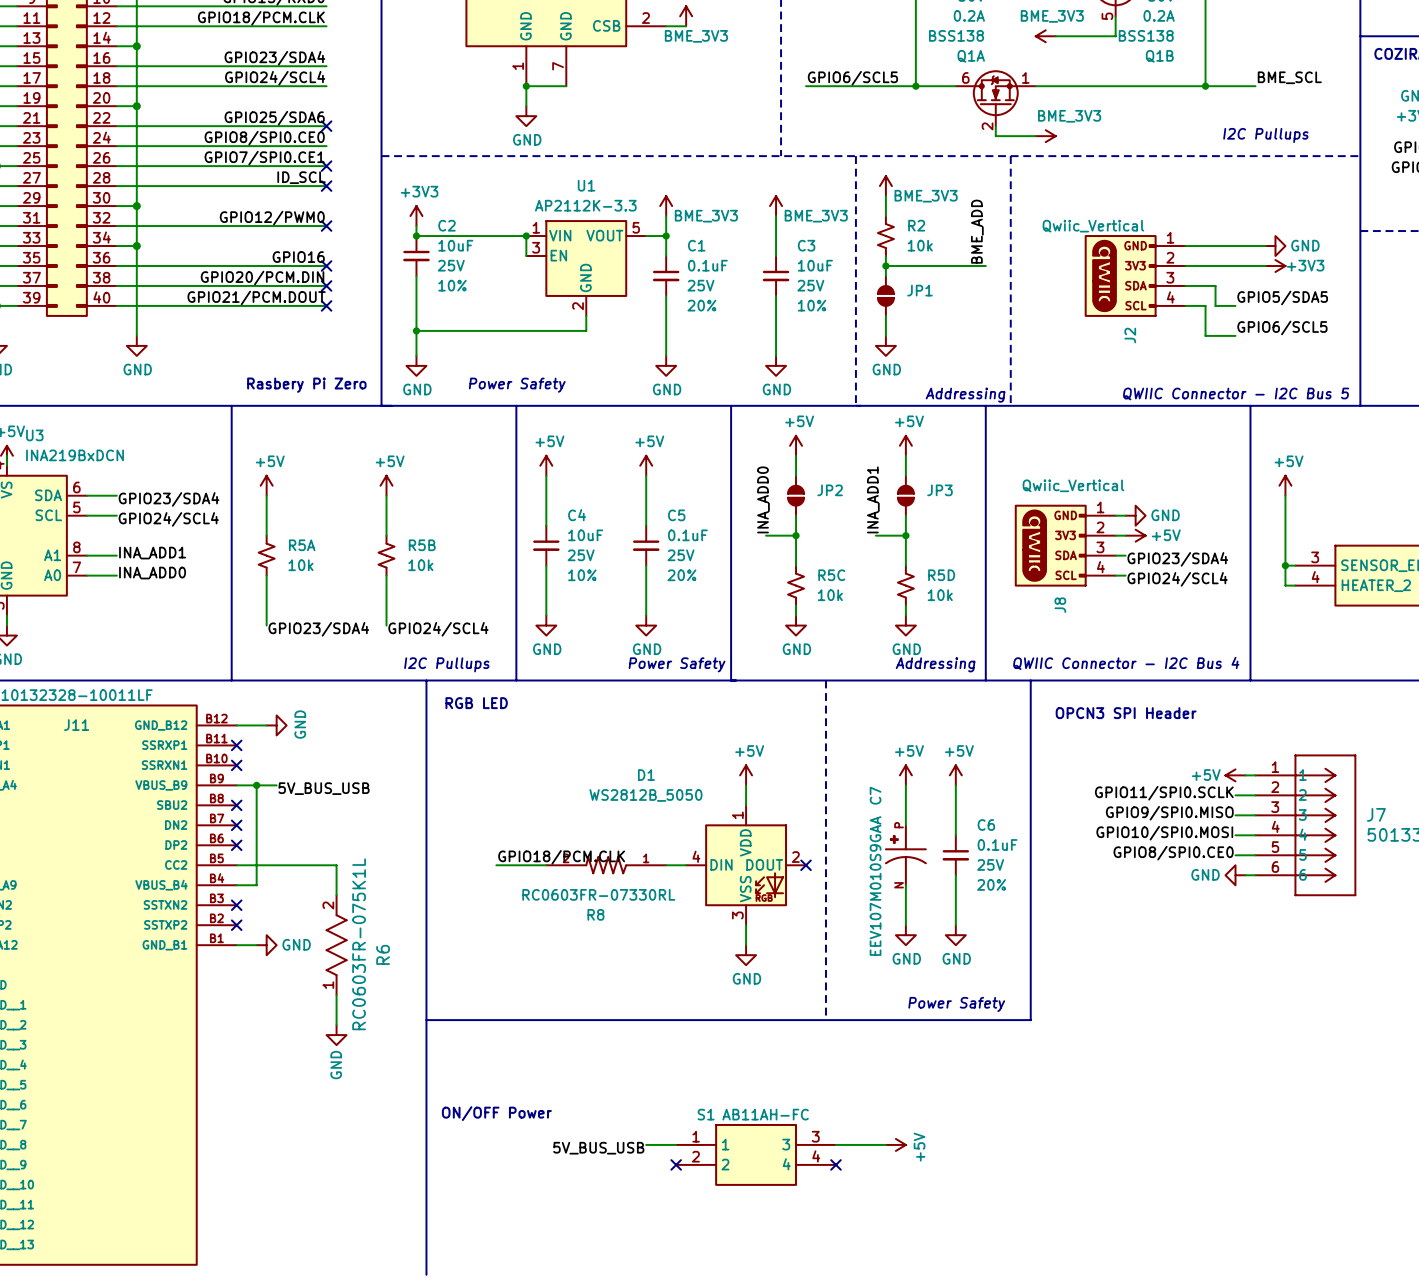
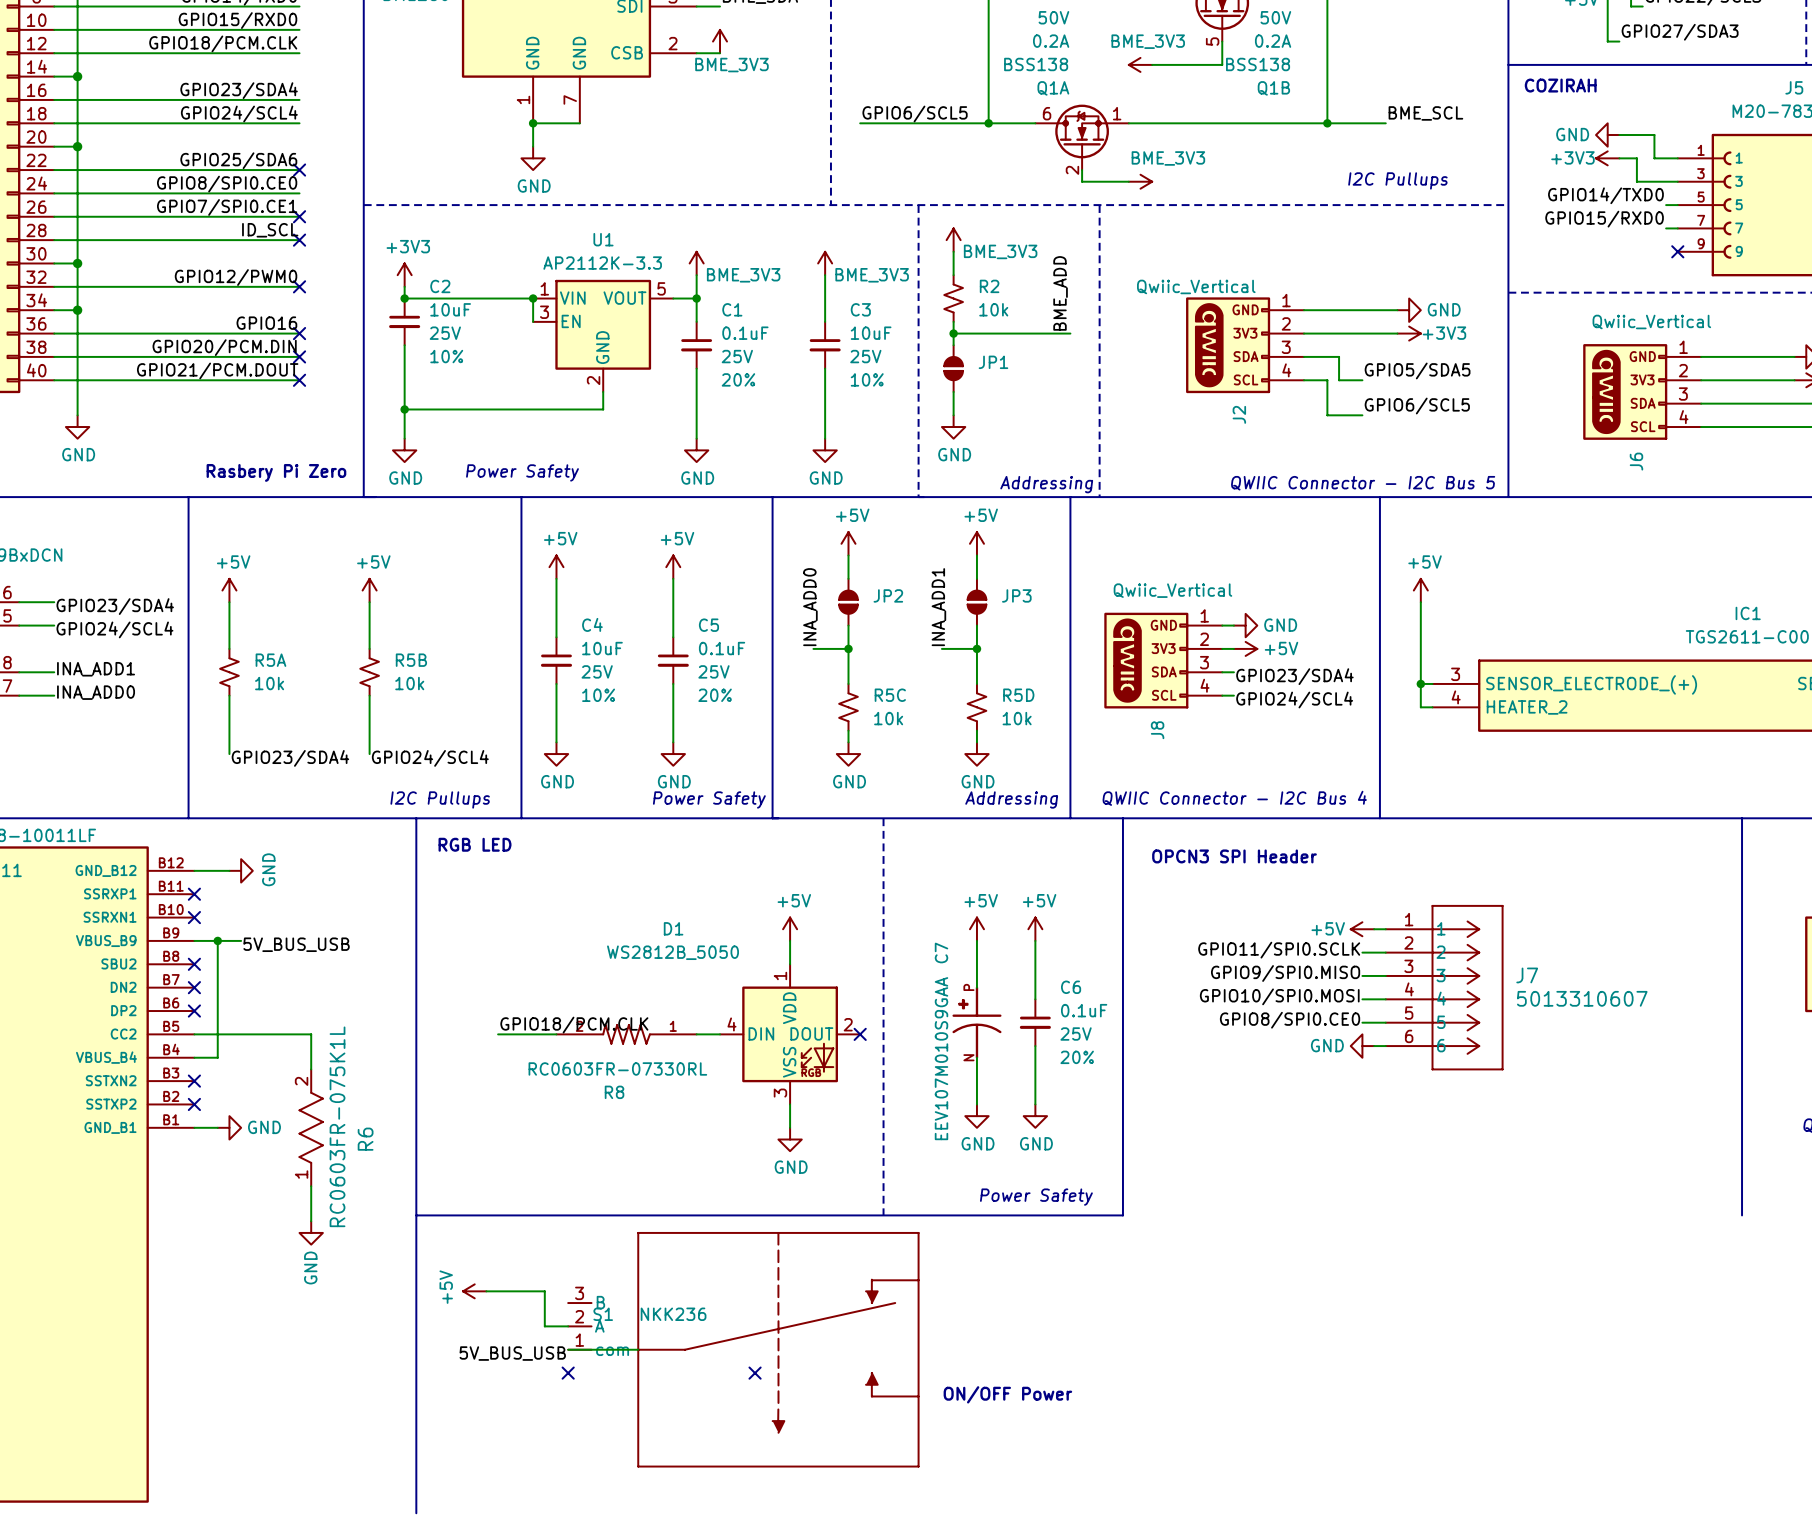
power symbol: none -> +5V (474, 1291)
wire: none -> (486, 1291) (544, 1291) (544, 1326) (568, 1326)
text: ON/OFF Power (496, 1113) -> none
S1 name position: S1 (706, 1114) -> S1 (603, 1314)
S1 value: AB11AH-FC (765, 1114) -> NKK236 (673, 1314)
S1 symbol: [676, 1123, 836, 1186] -> [568, 1232, 920, 1468]
wire: none -> (568, 1349) (638, 1349)
wire: (646, 1144) (676, 1144) -> none
wire: (835, 1144) (885, 1144) -> none
power symbol: +5V (895, 1144) -> none
label position: 5V_BUS_USB (598, 1148) -> 5V_BUS_USB (512, 1353)
no-connect mark: none -> (568, 1373)
no-connect mark position: (676, 1164) -> (755, 1373)
no-connect mark: (835, 1164) -> none
text: none -> ON/OFF Power (1007, 1394)

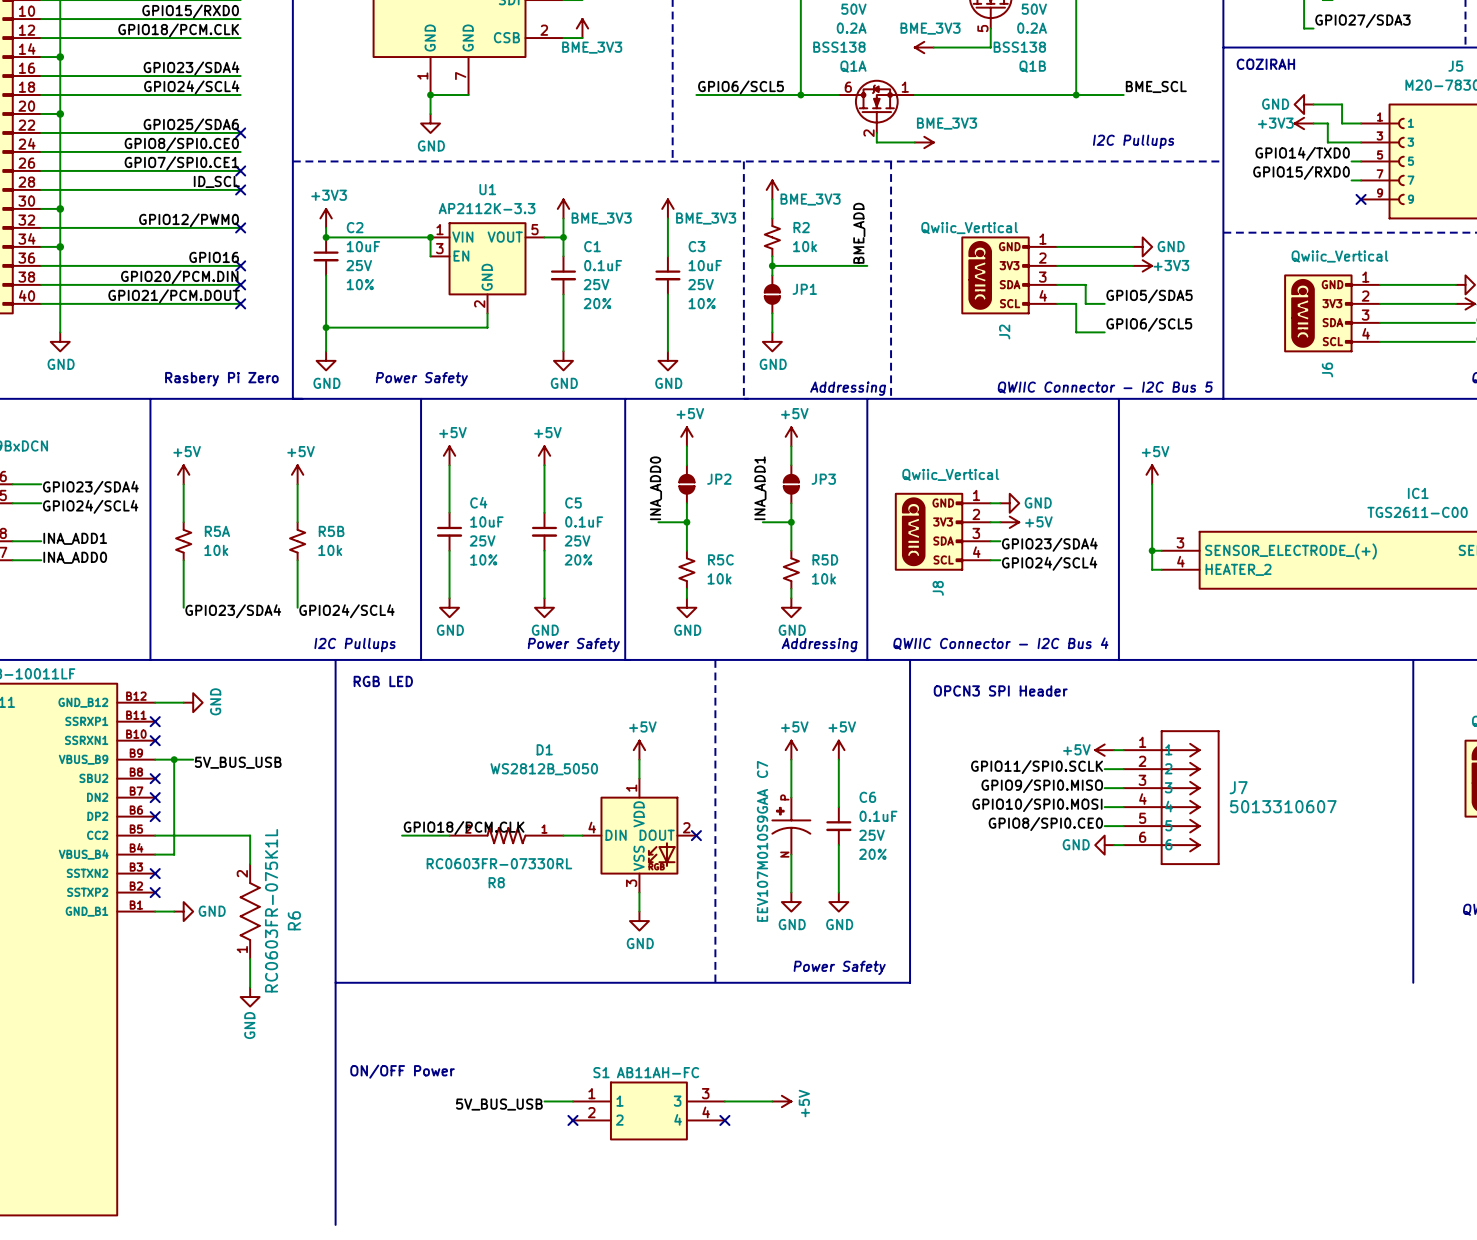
S1 symbol: [568, 1232, 920, 1468] -> [572, 1081, 725, 1141]
power symbol: +5V (474, 1291) -> none
wire: (486, 1291) (544, 1291) (544, 1326) (568, 1326) -> none
S1 name position: S1 (603, 1314) -> S1 (601, 1072)
S1 value: NKK236 (673, 1314) -> AB11AH-FC (657, 1072)
text: none -> ON/OFF Power (402, 1071)
wire: (568, 1349) (638, 1349) -> none
label position: 5V_BUS_USB (512, 1353) -> 5V_BUS_USB (499, 1104)
wire: none -> (544, 1101) (572, 1101)
wire: none -> (724, 1101) (772, 1101)
power symbol: none -> +5V (781, 1101)
no-connect mark: (568, 1373) -> none
no-connect mark position: (755, 1373) -> (572, 1120)
no-connect mark: none -> (724, 1120)
text: ON/OFF Power (1007, 1394) -> none

